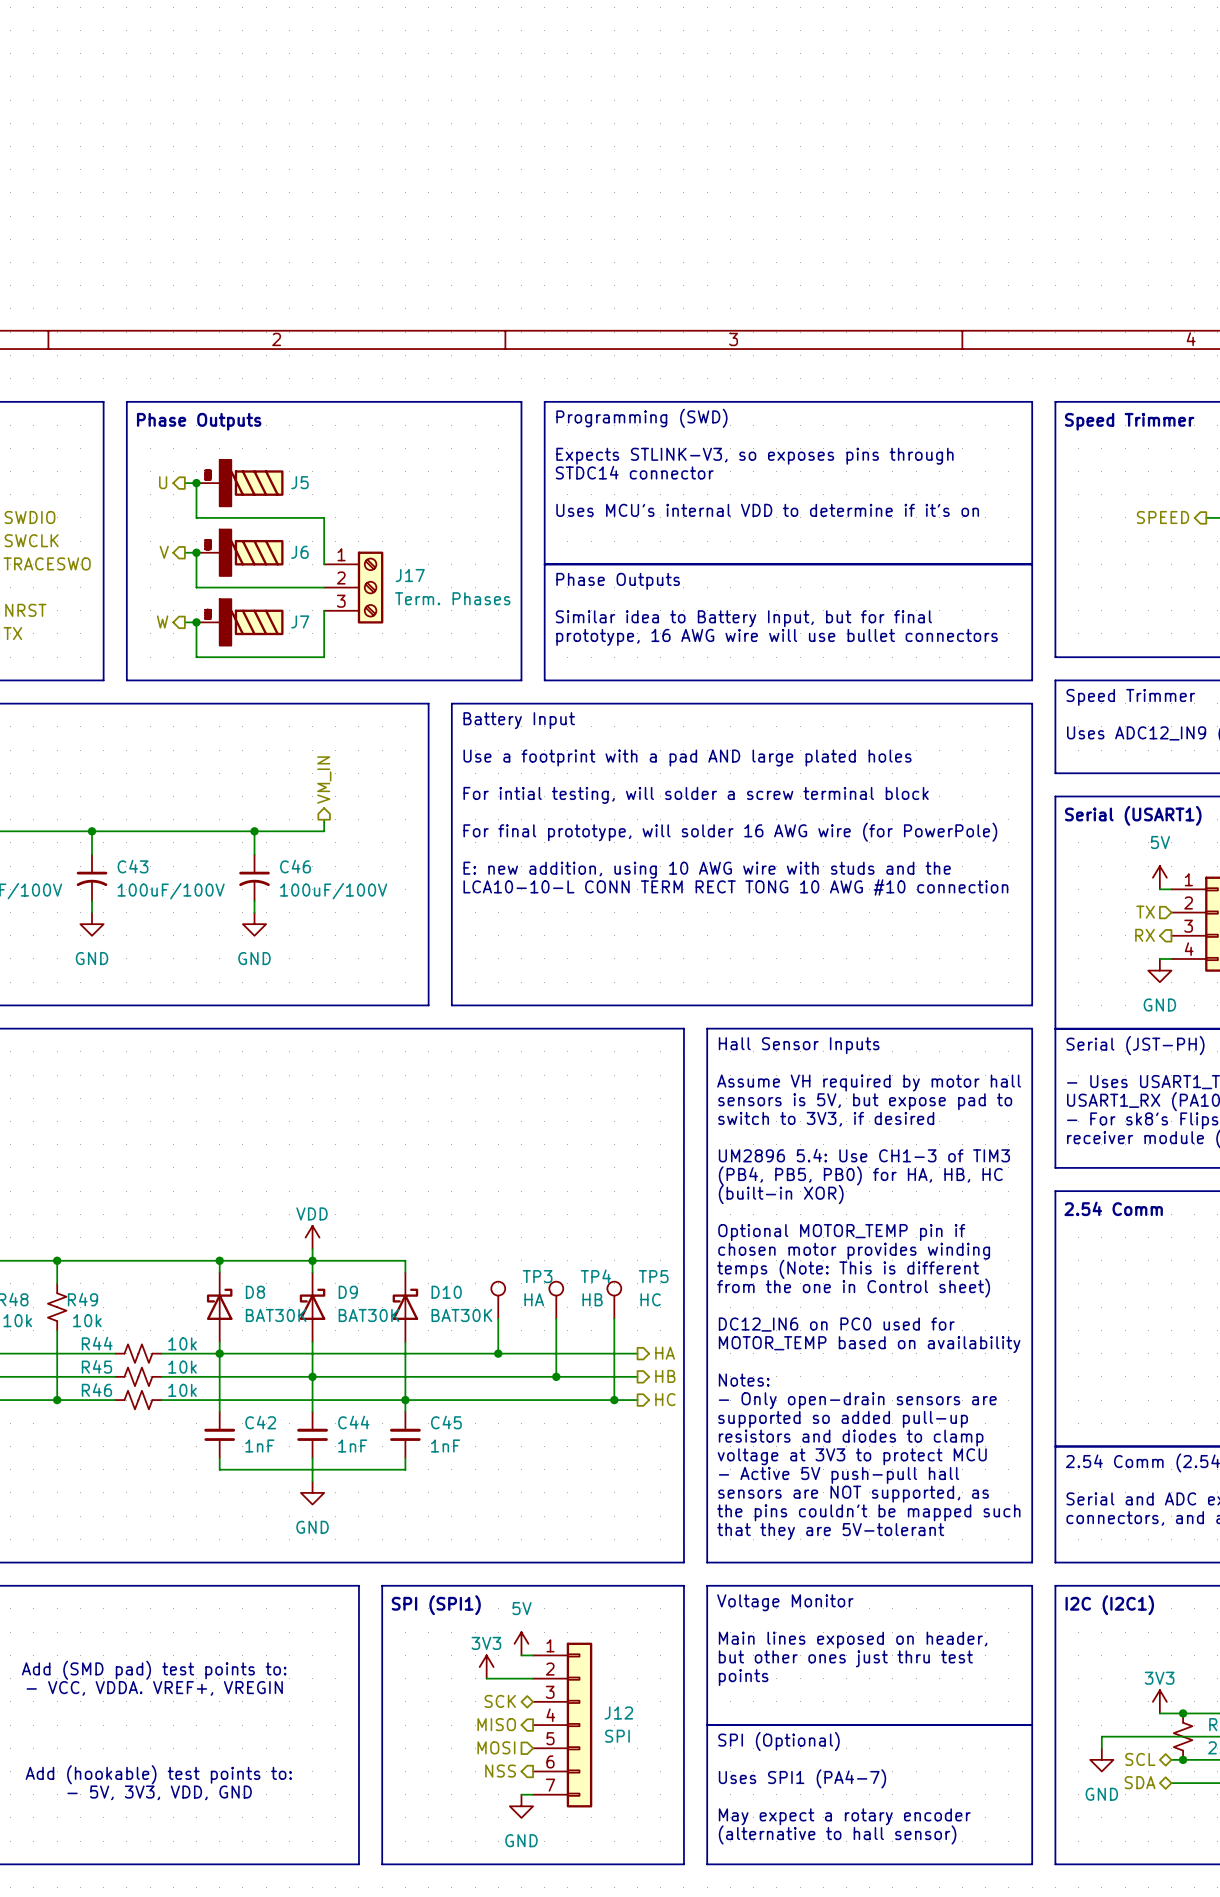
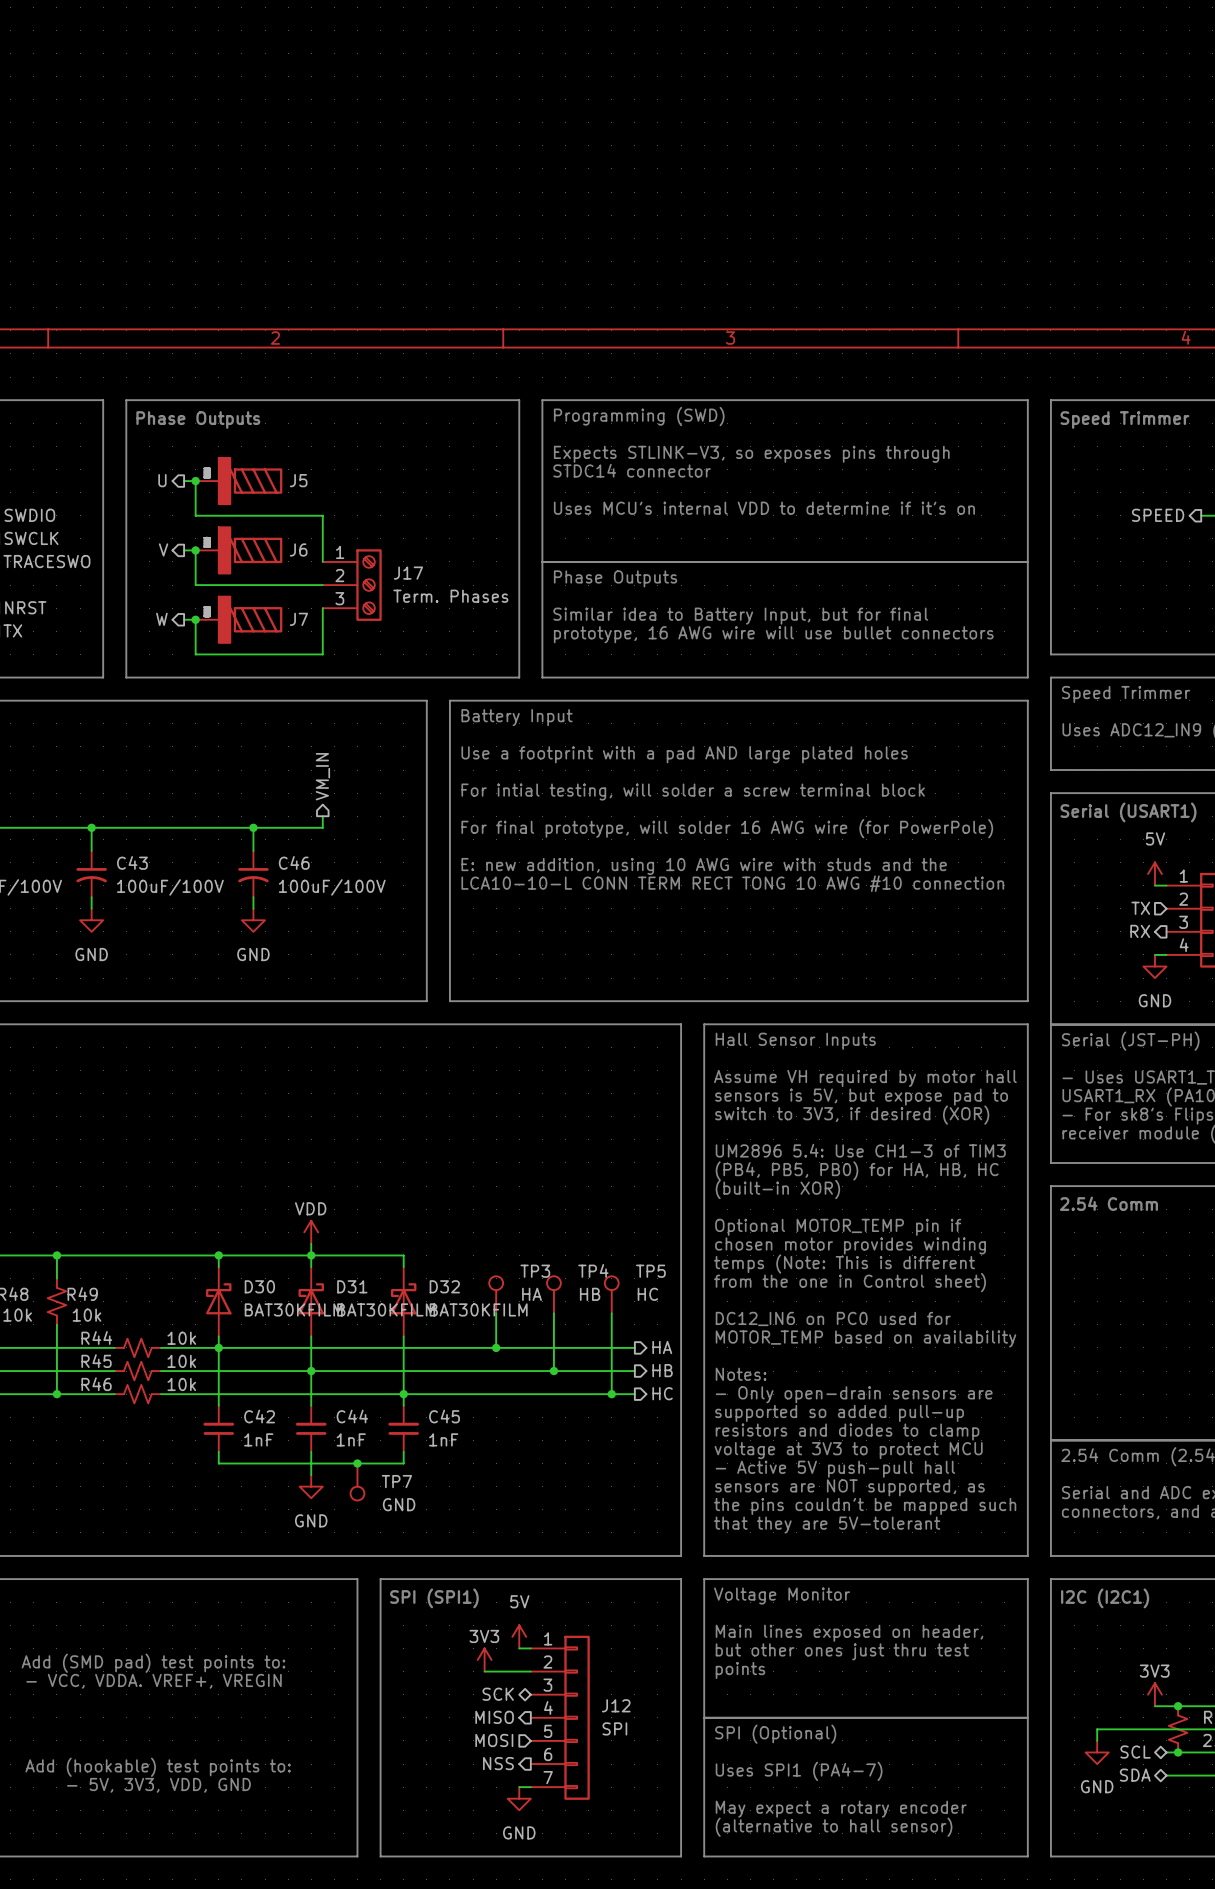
text: switch to 3V3, if desired (826, 1119) -> switch to 3V3, if desired (XOR) (852, 1115)
D8 name: D8 (255, 1292) -> D30 (259, 1286)
D9 name: D9 (348, 1292) -> D31 (352, 1286)
D10 name: D10 (446, 1292) -> D32 (444, 1286)
D8 value: BAT30K (276, 1315) -> BAT30KFILM (293, 1309)
D9 value: BAT30K (369, 1315) -> BAT30KFILM (386, 1309)
D10 value: BAT30K (461, 1315) -> BAT30KFILM (478, 1309)
junction: none -> (357, 1463)
TP7: none -> GND (357, 1482)

